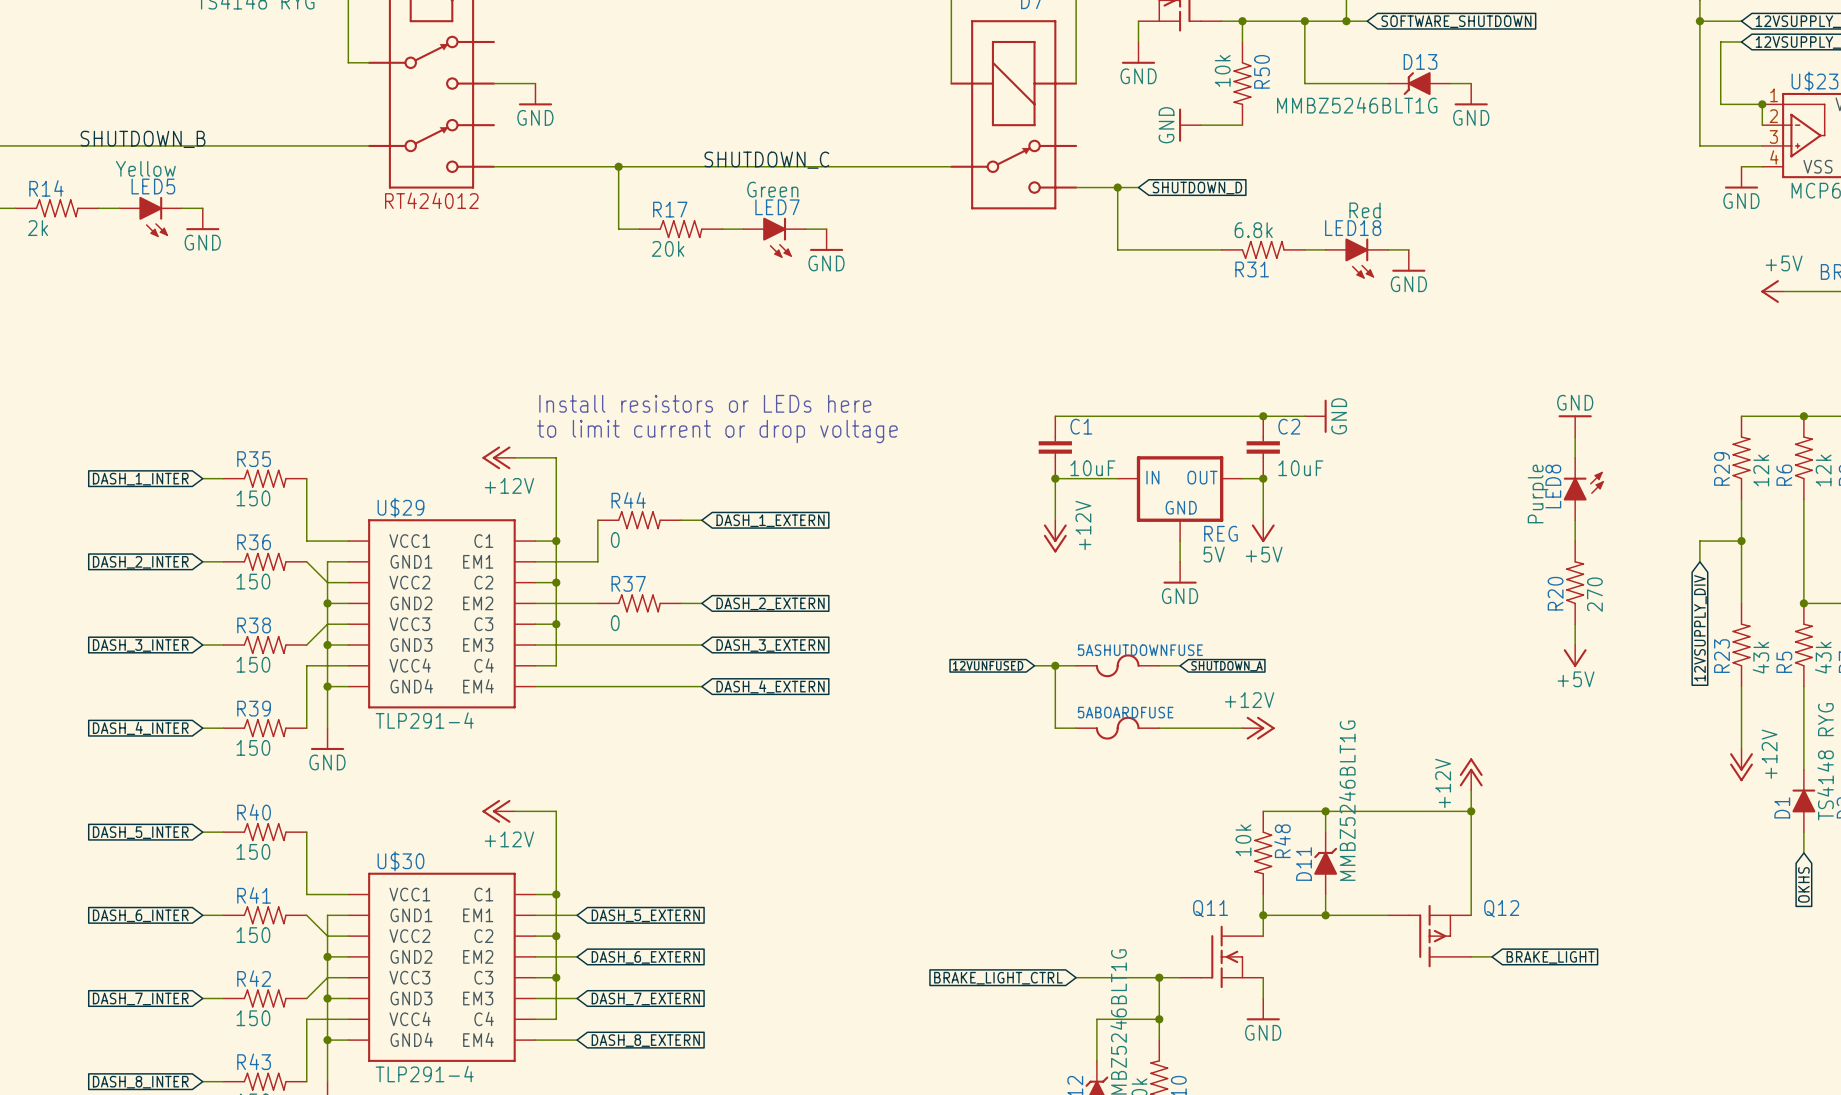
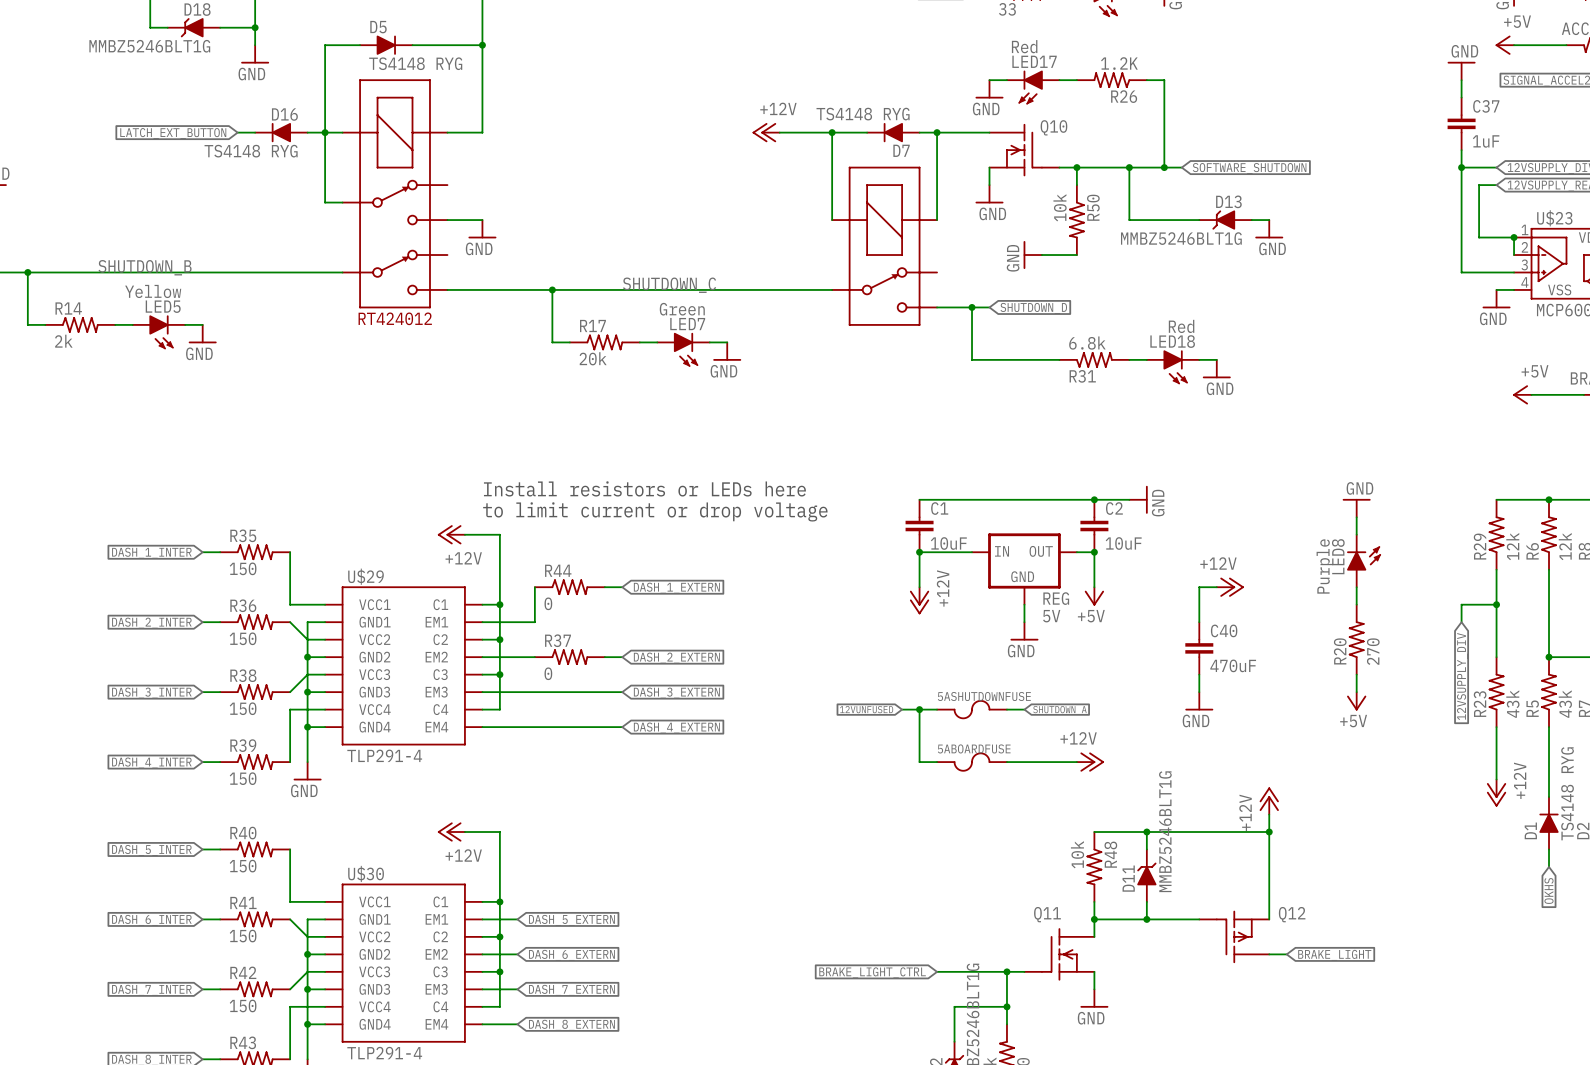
wire: none -> (1216, 587) (1199, 587) (1199, 622)
power symbol: none -> +12V (1230, 587)
C40: none -> 470uF (1199, 648)
wire: none -> (1199, 674) (1199, 692)
power symbol: none -> GND (1199, 701)

